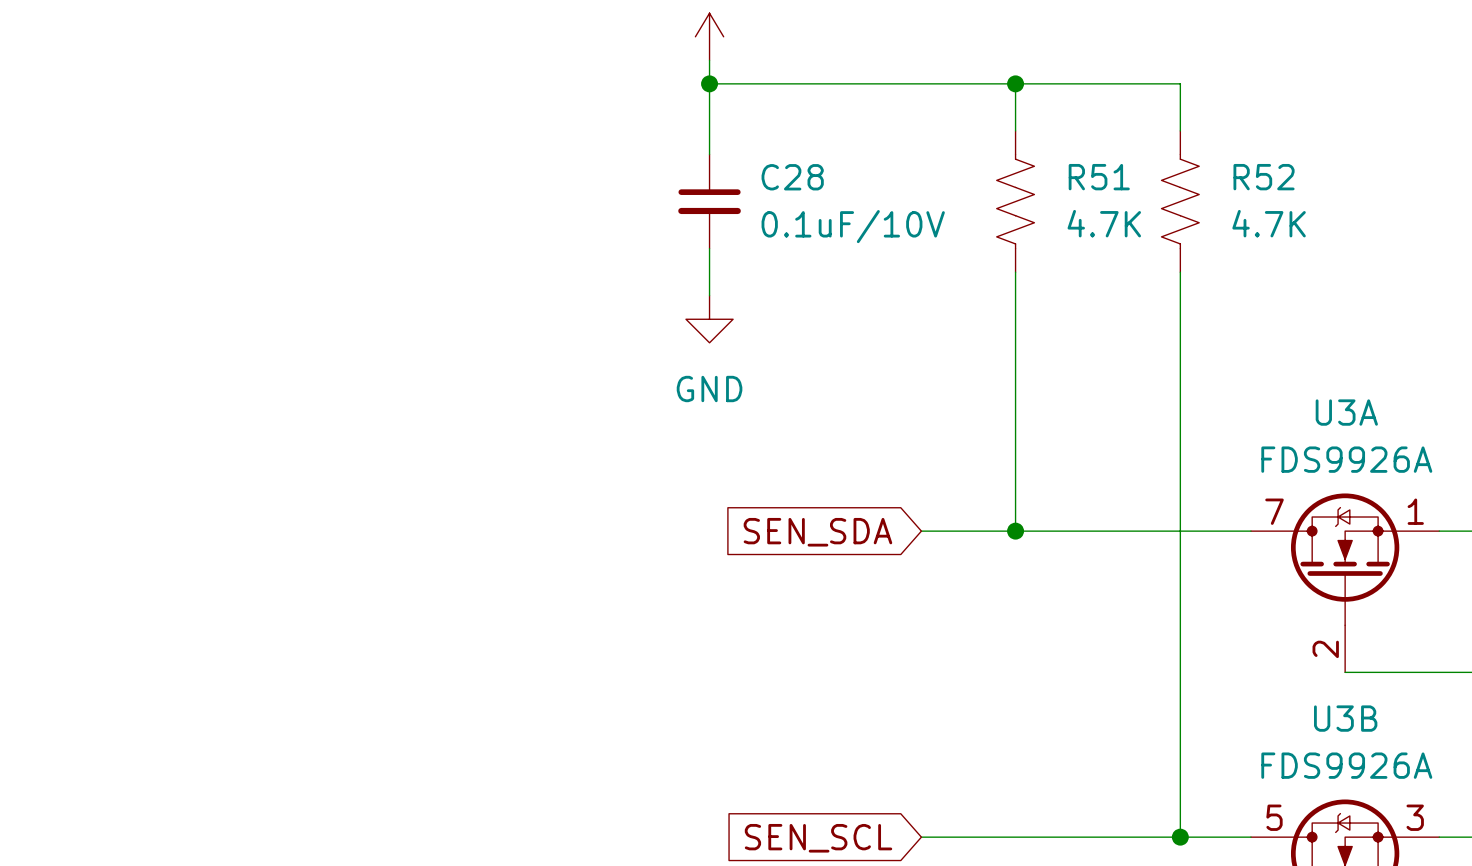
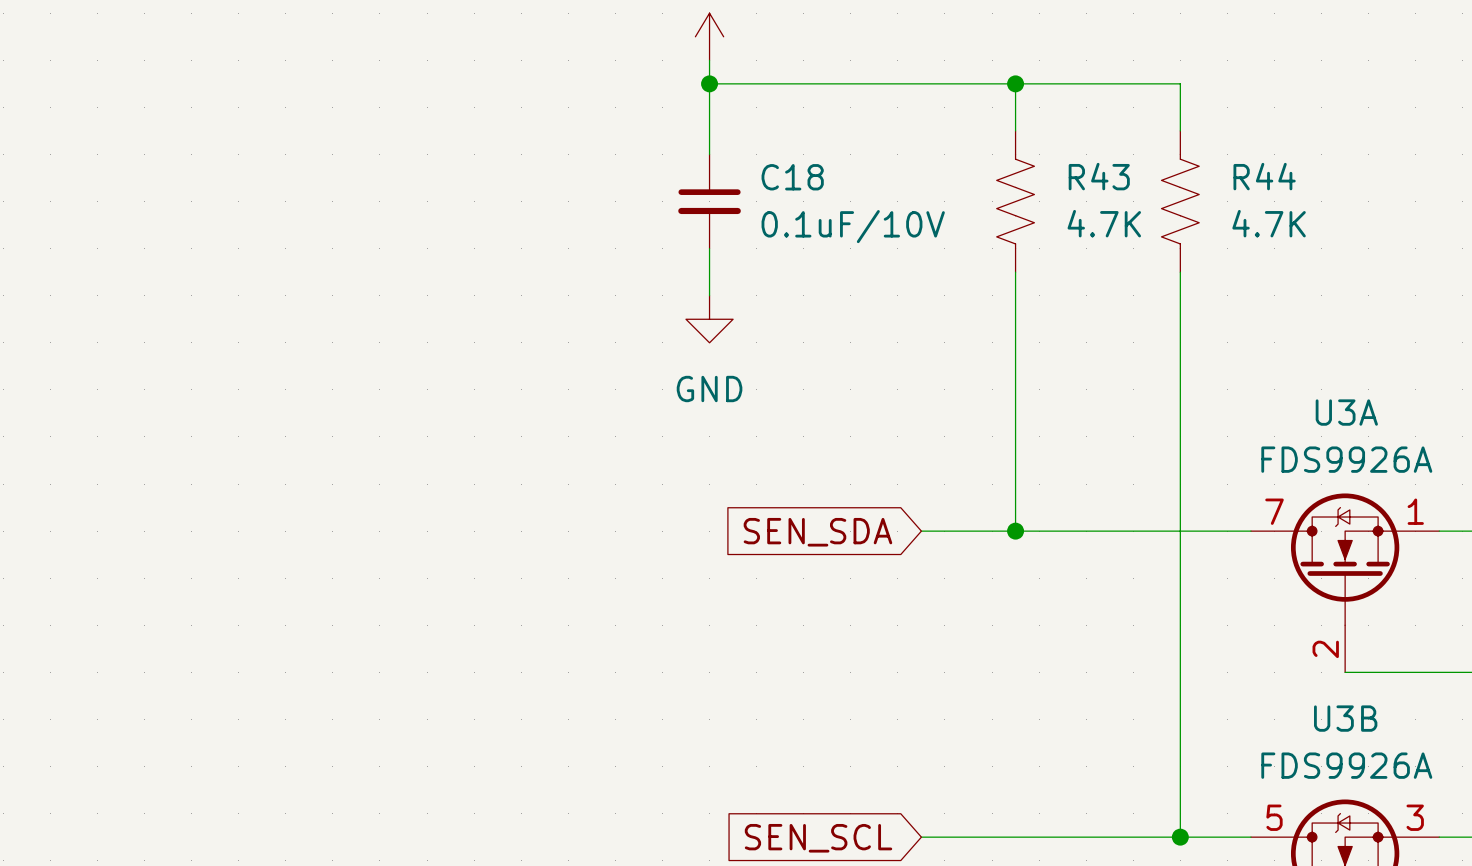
C28 name: C28 (792, 177) -> C18 (792, 177)
R51 name: R51 (1099, 177) -> R43 (1099, 176)
R52 name: R52 (1264, 177) -> R44 (1264, 176)

